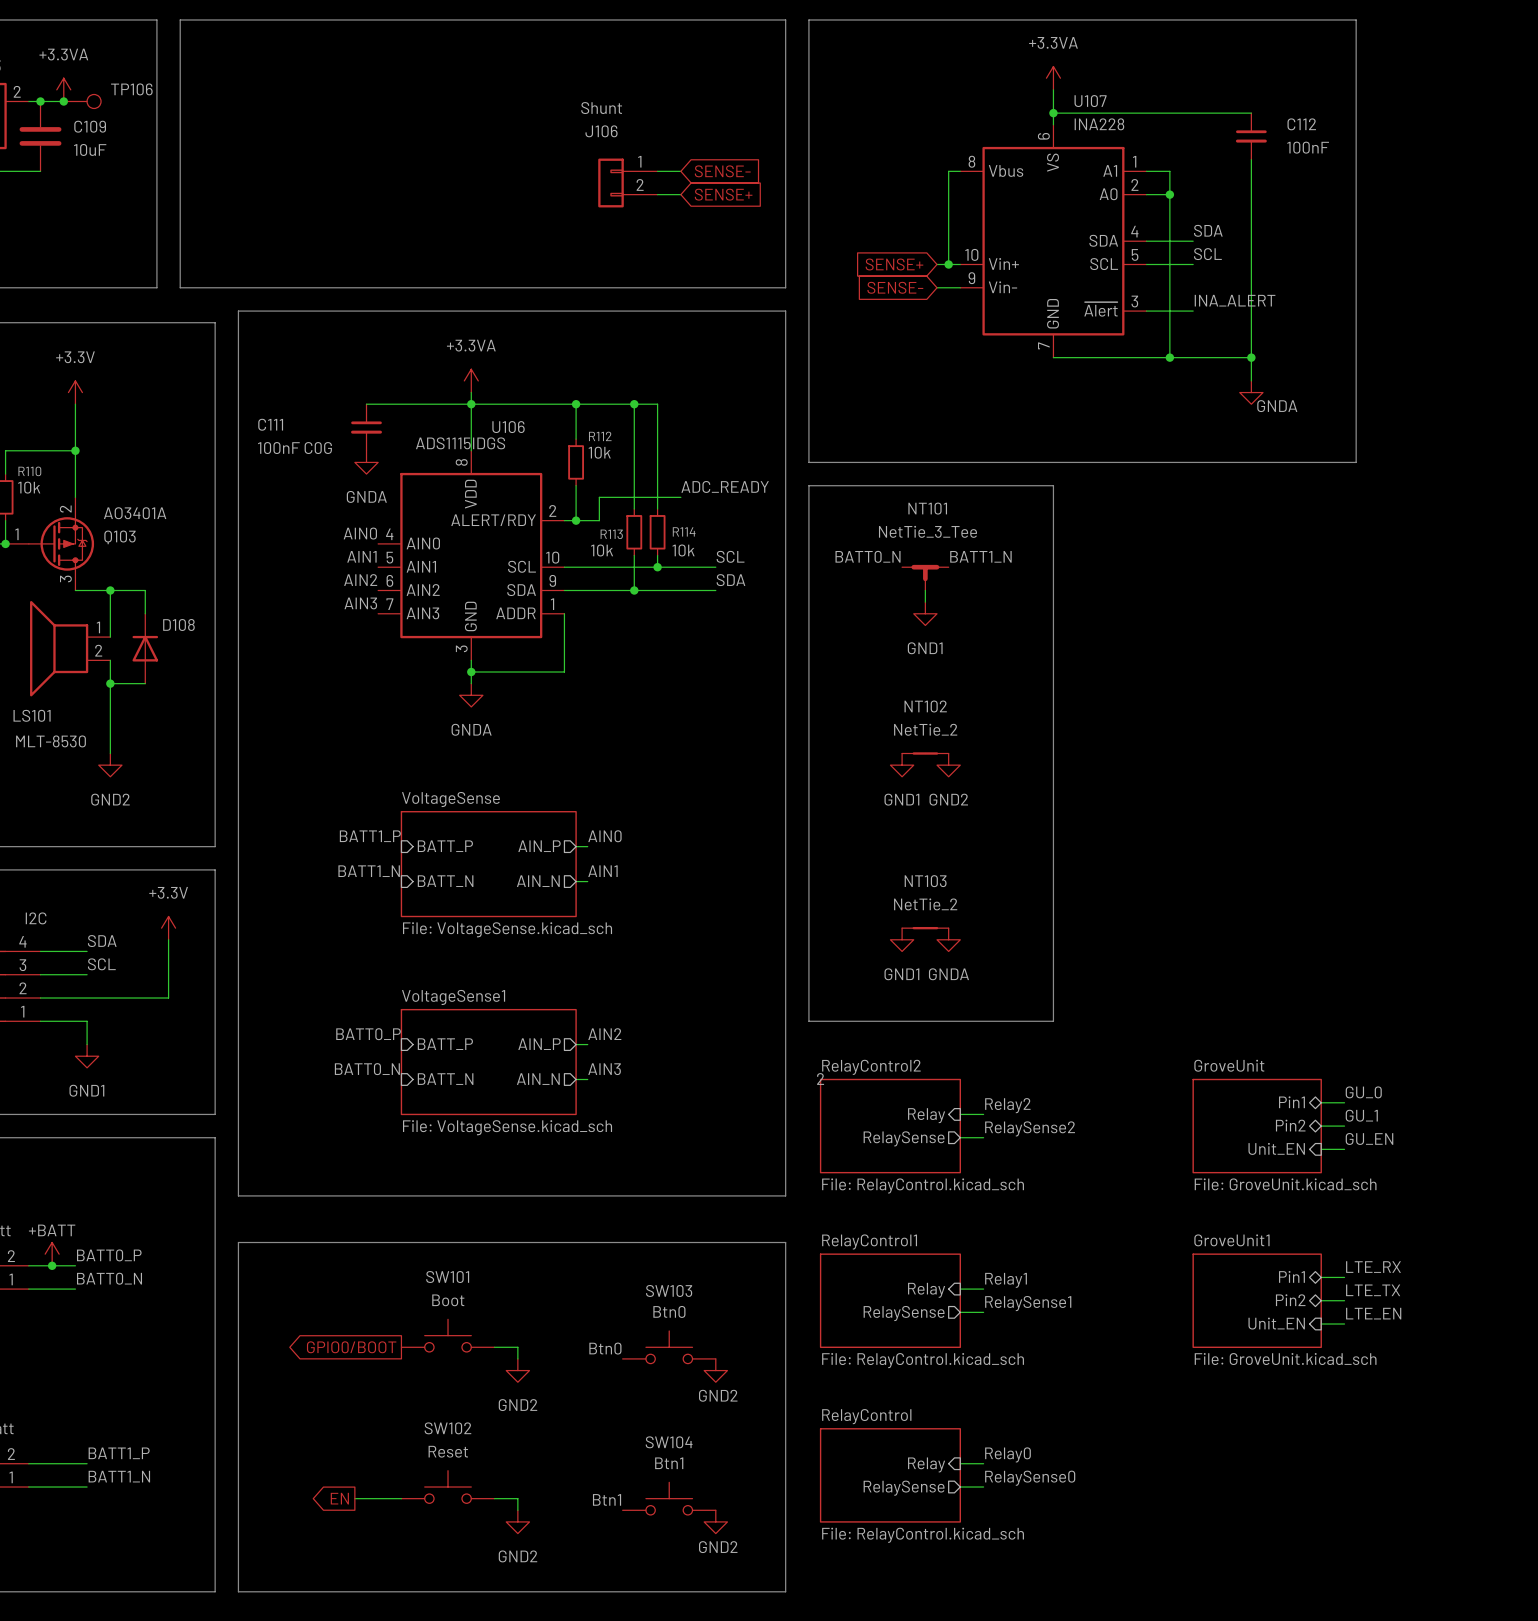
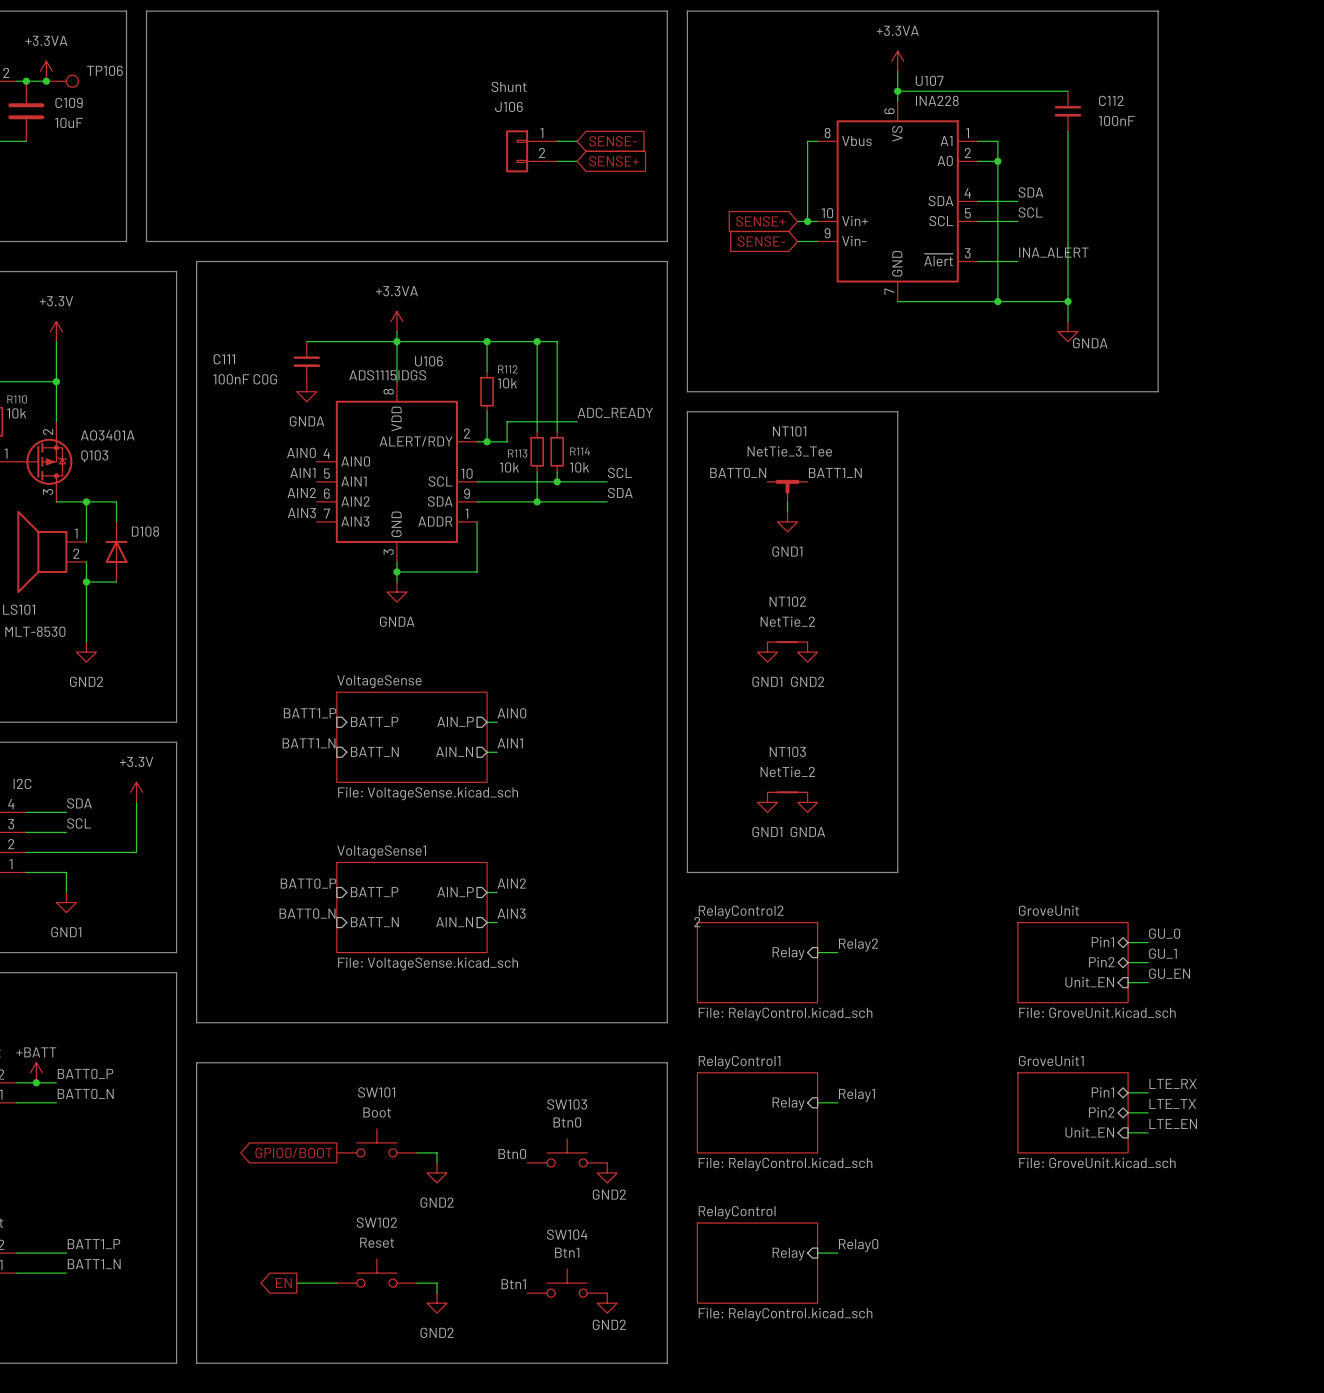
label: RelaySense2 (1030, 1128) -> none
wire: (960, 1137) (983, 1137) -> none
sheet pin: RelaySense (904, 1138) -> none
label: RelaySense1 (1028, 1303) -> none
wire: (960, 1312) (983, 1312) -> none
sheet pin: RelaySense (904, 1313) -> none
label: RelaySense0 (1030, 1478) -> none
wire: (960, 1487) (983, 1487) -> none
sheet pin: RelaySense (904, 1488) -> none

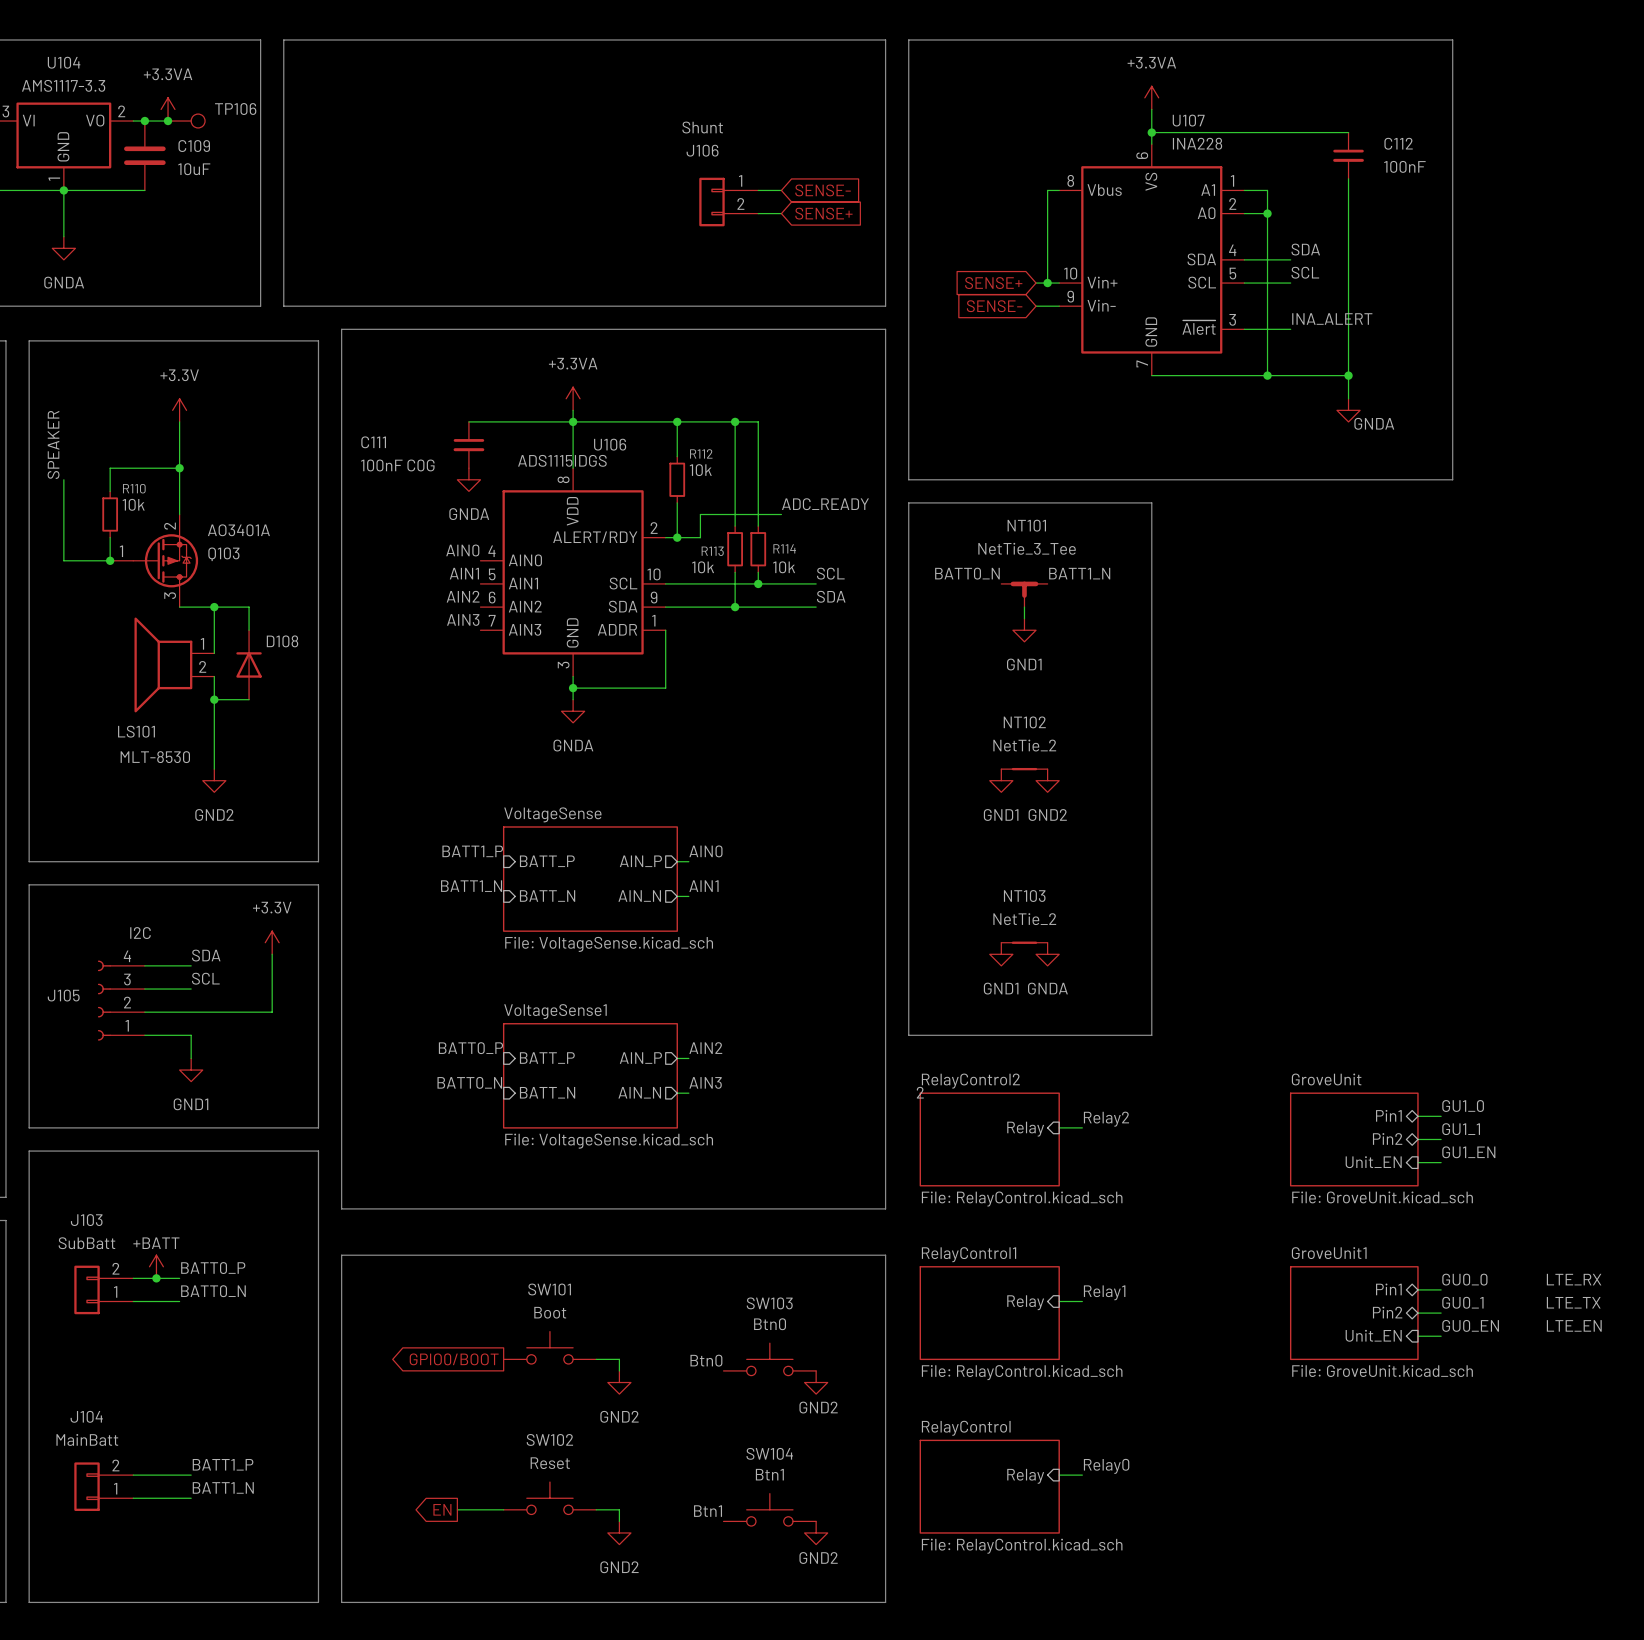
label: GU_0 (1164, 933) -> GU1_0 (1463, 1106)
label: GU_1 (1162, 953) -> GU1_1 (1461, 1129)
label: GU_EN (1169, 973) -> GU1_EN (1468, 1152)
label: LTE_RX (1173, 1083) -> GU0_0 (1464, 1279)
label: none -> LTE_RX (1574, 1279)
label: LTE_TX (1172, 1103) -> GU0_1 (1462, 1302)
label: none -> LTE_TX (1573, 1302)
label: LTE_EN (1173, 1123) -> GU0_EN (1470, 1325)
label: none -> LTE_EN (1574, 1325)

